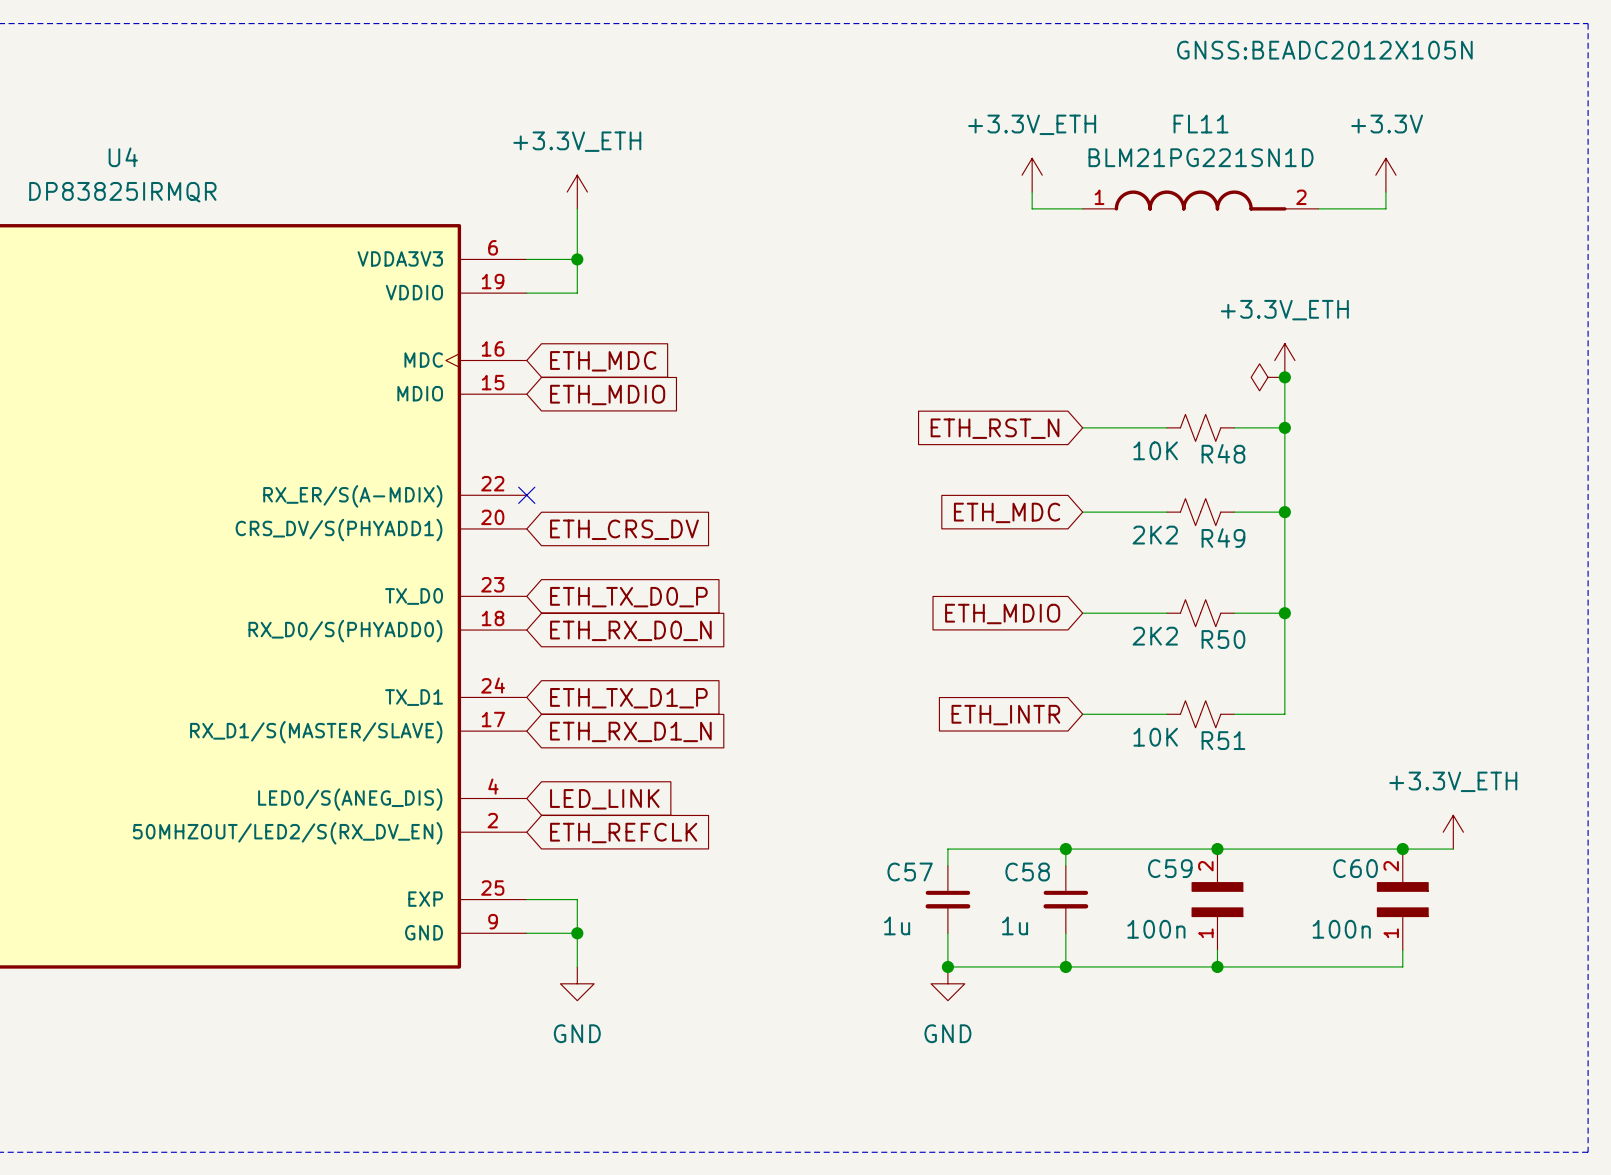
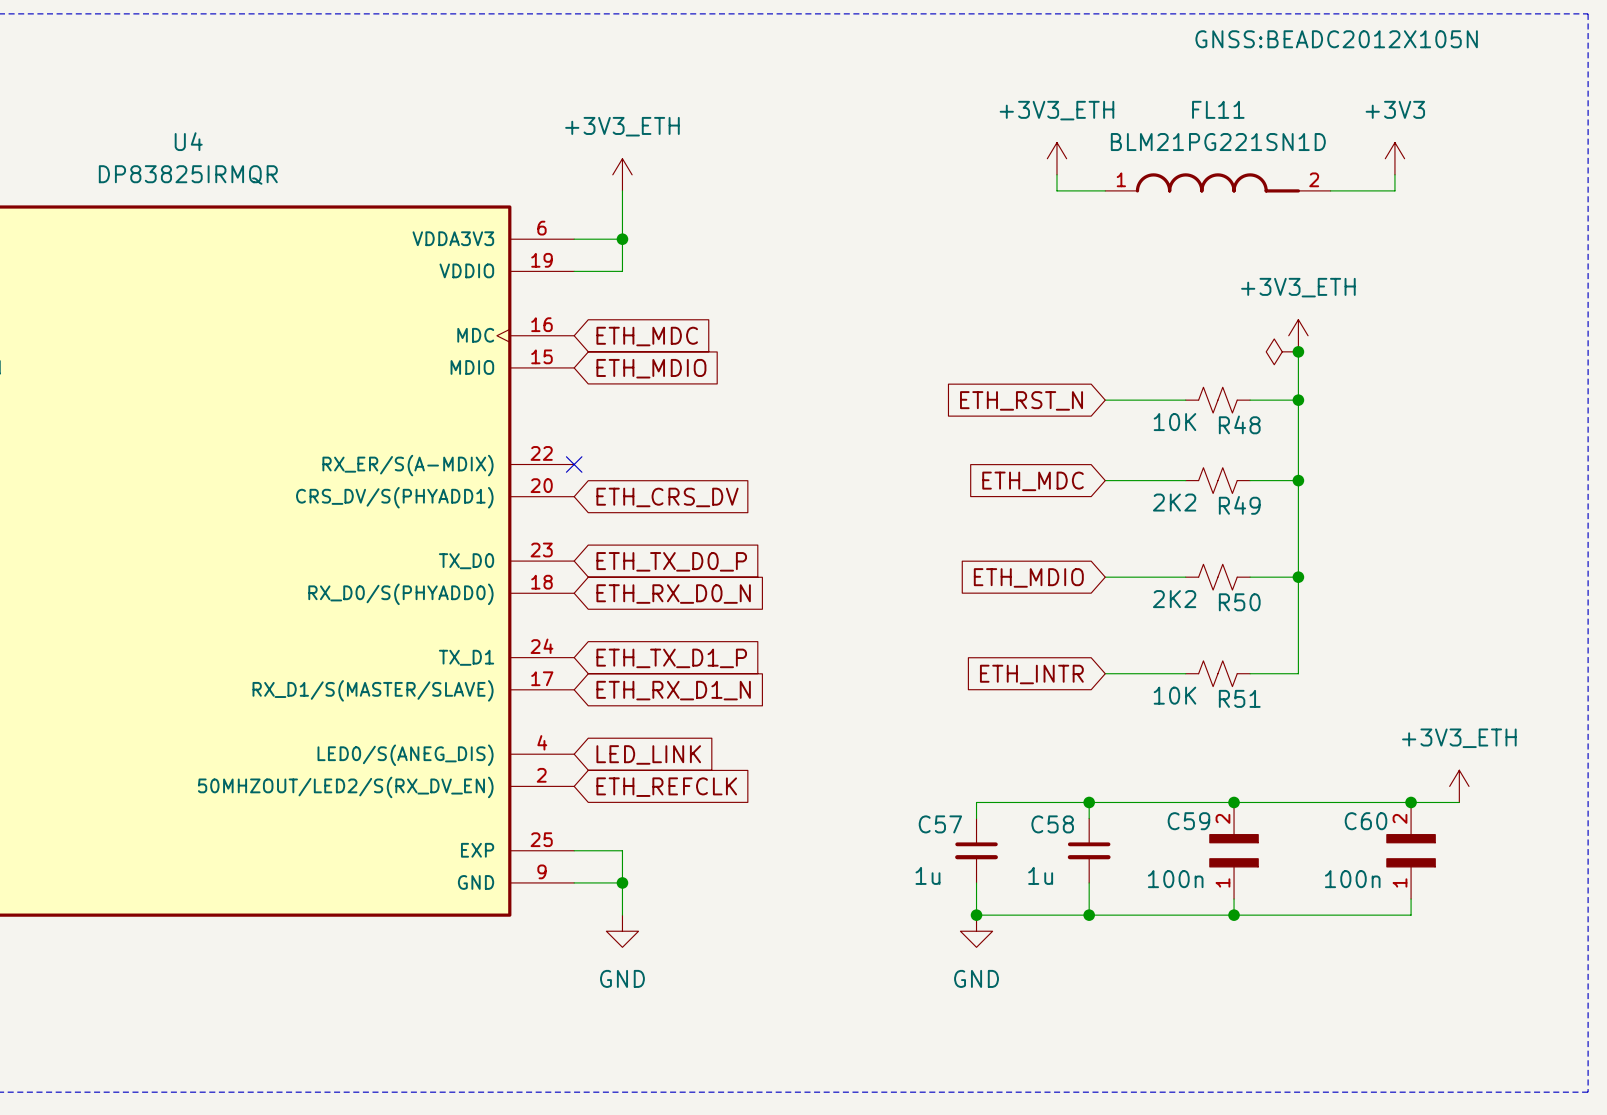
power symbol: +3.3V_ETH (1032, 175) -> +3V3_ETH (1056, 158)
power symbol: +3.3V (1385, 175) -> +3V3 (1394, 158)
power symbol: +3.3V_ETH (577, 192) -> +3V3_ETH (622, 174)
power symbol: +3.3V_ETH (1284, 360) -> +3V3_ETH (1298, 335)
power symbol: +3.3V_ETH (1453, 832) -> +3V3_ETH (1459, 786)

